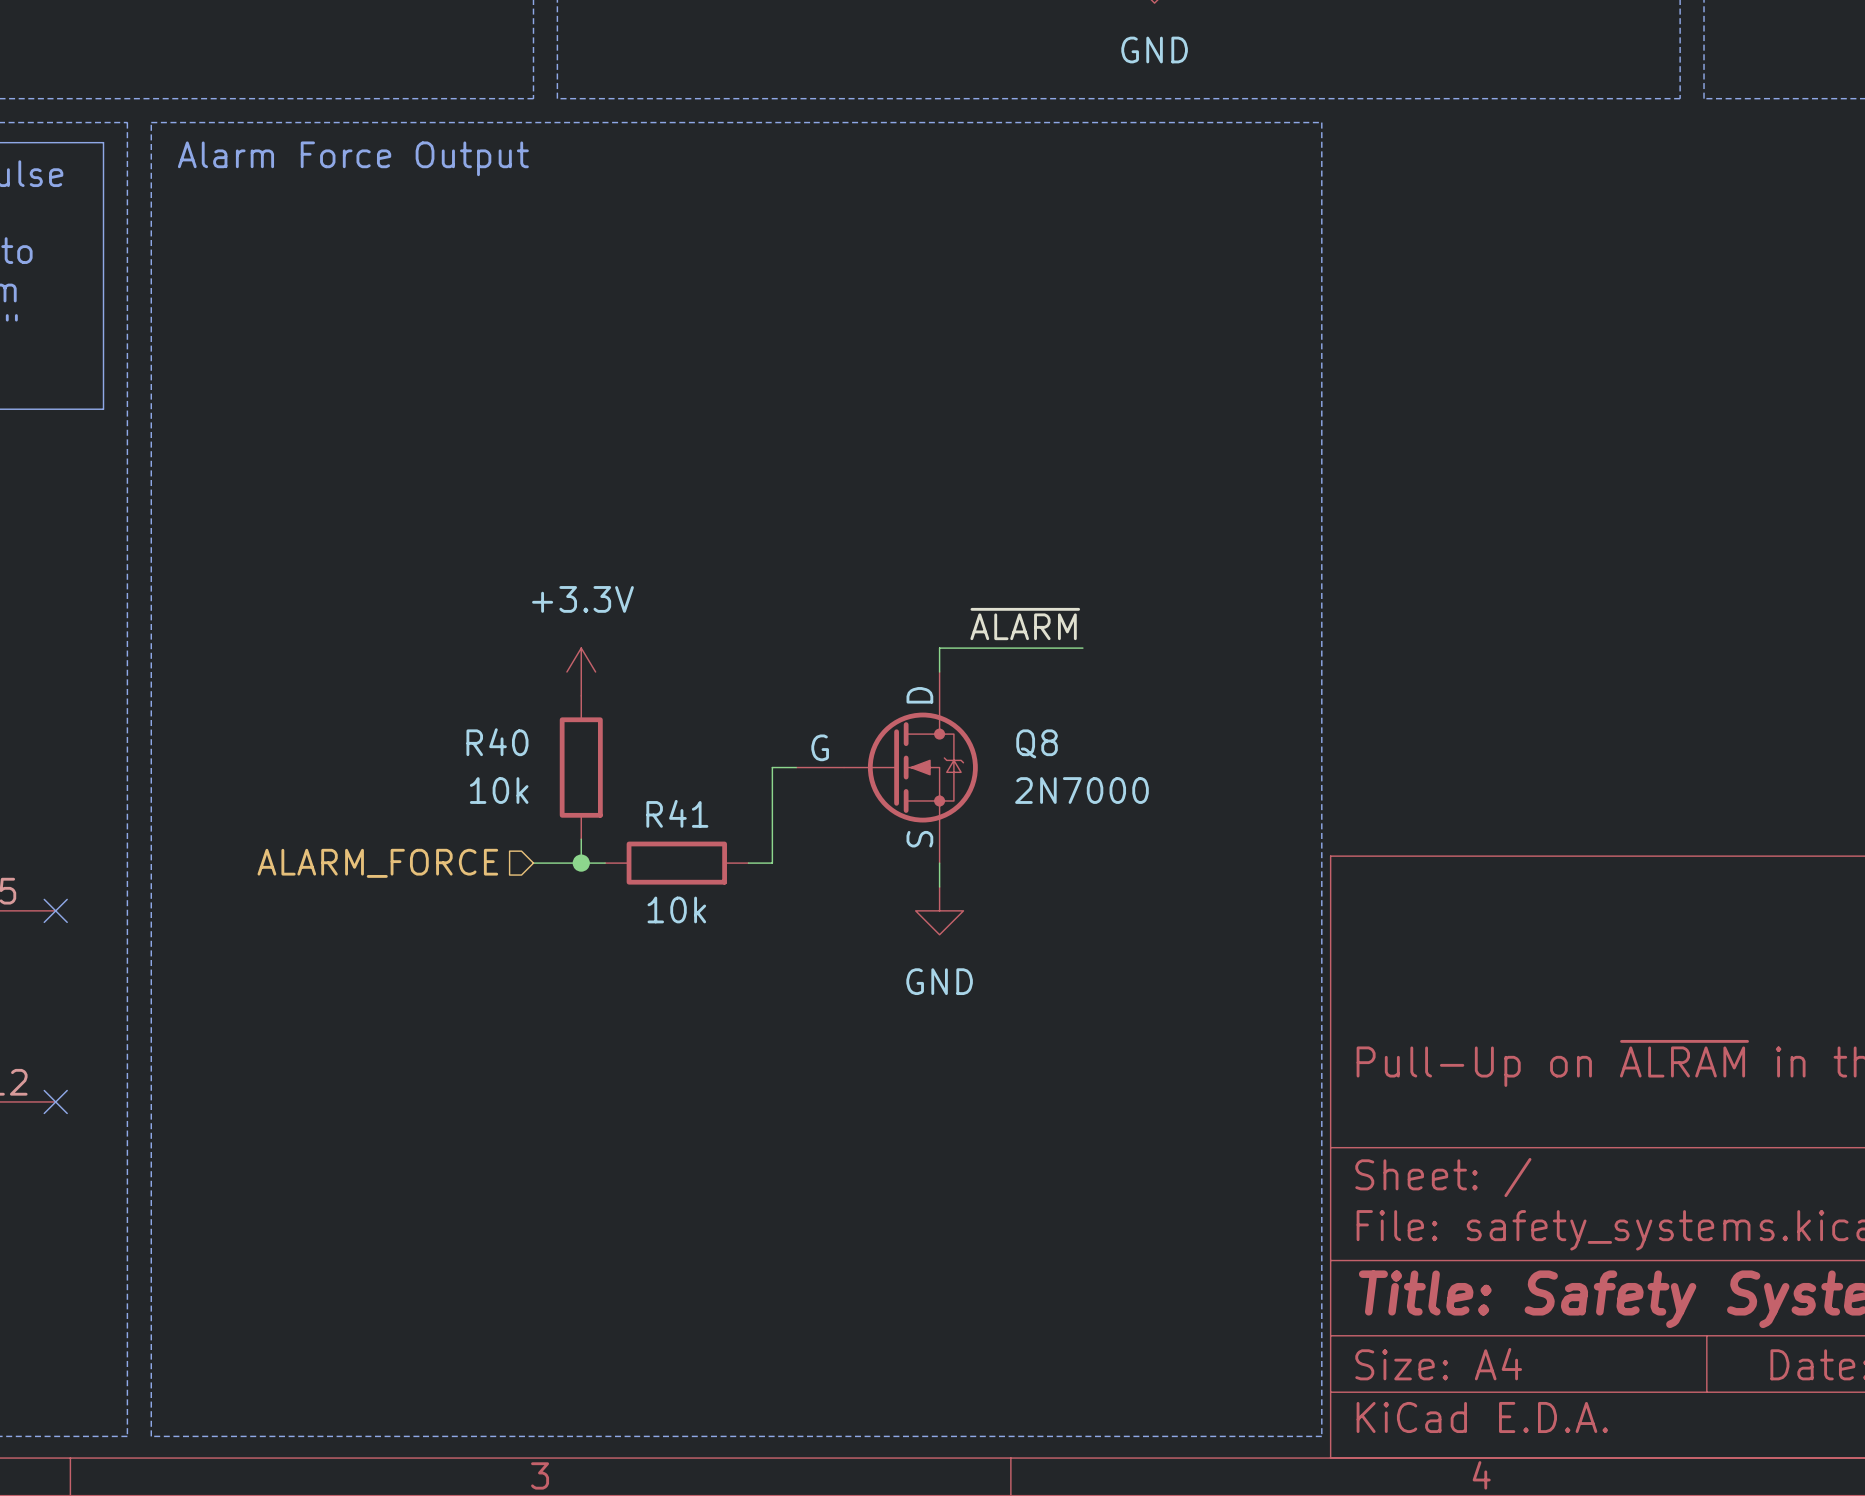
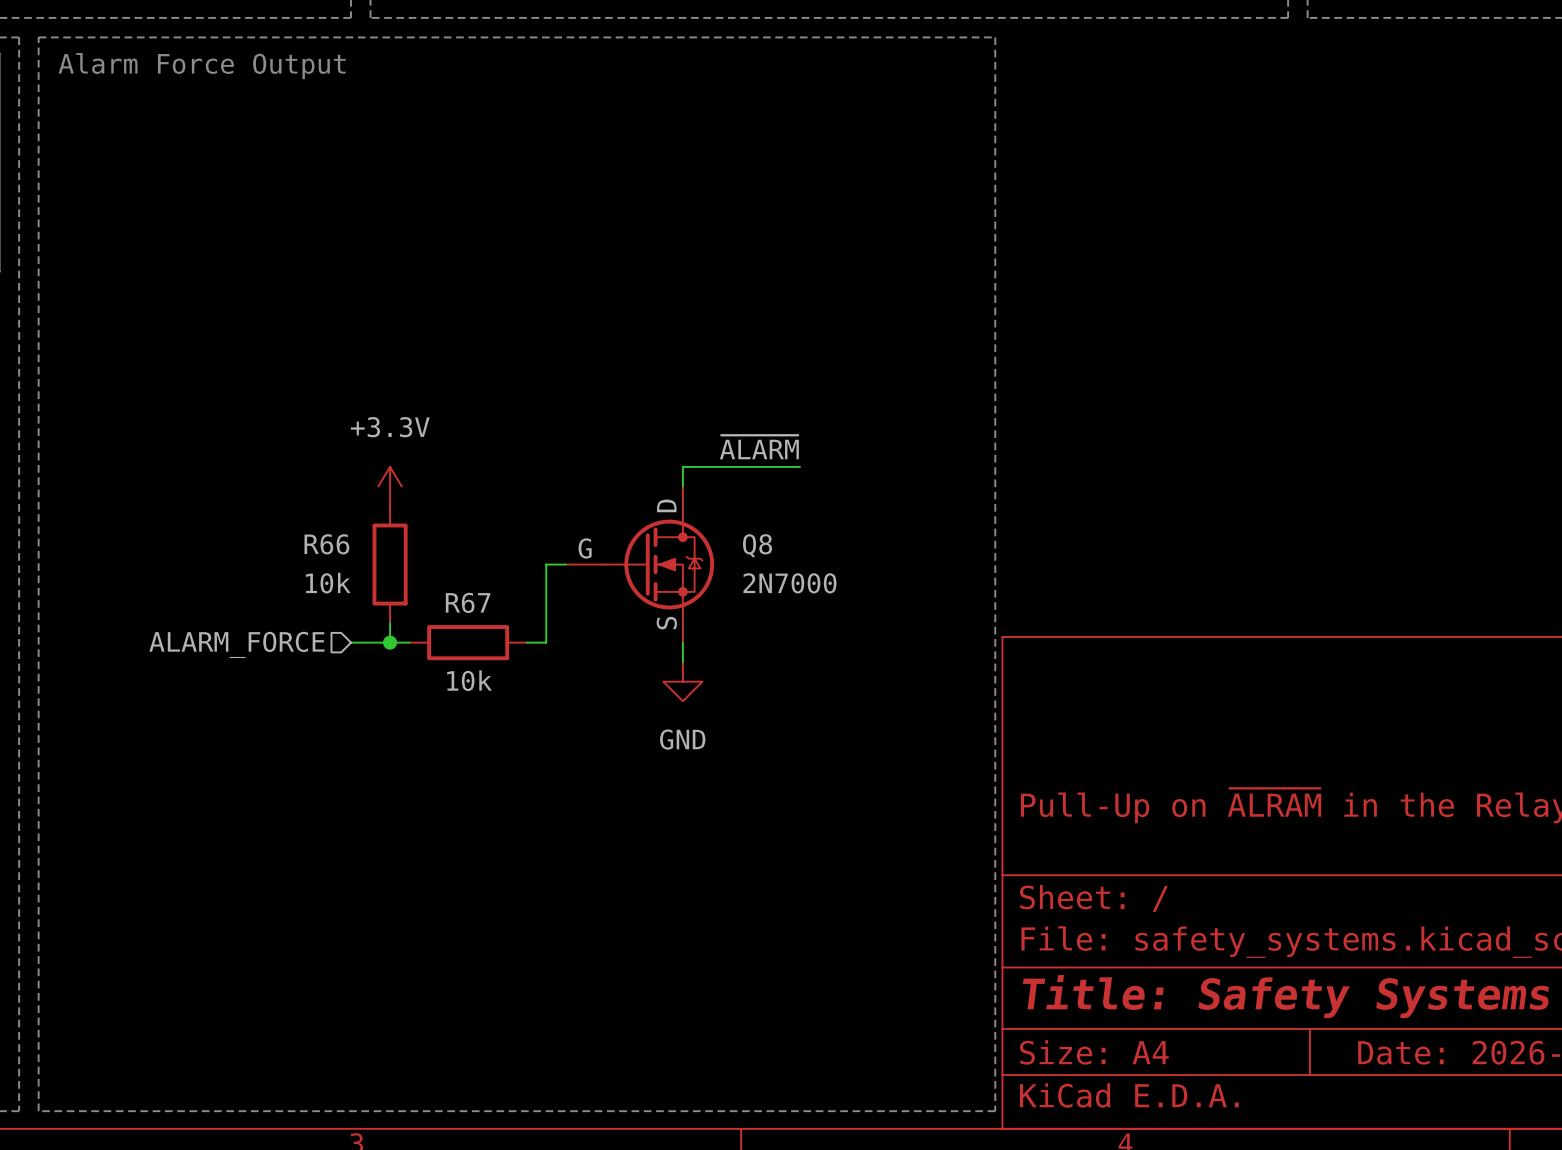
R40 name: R40 (497, 742) -> R66 (326, 544)
R41 name: R41 (677, 813) -> R67 (468, 602)

